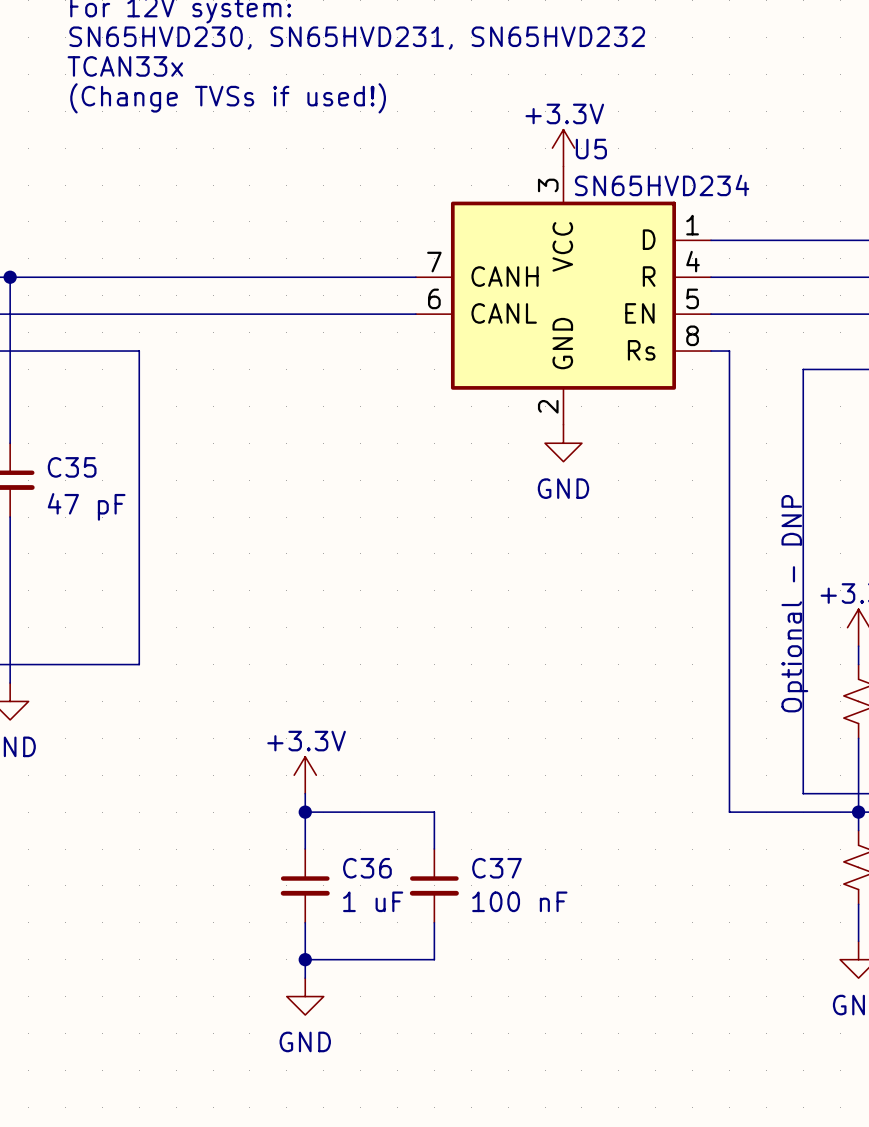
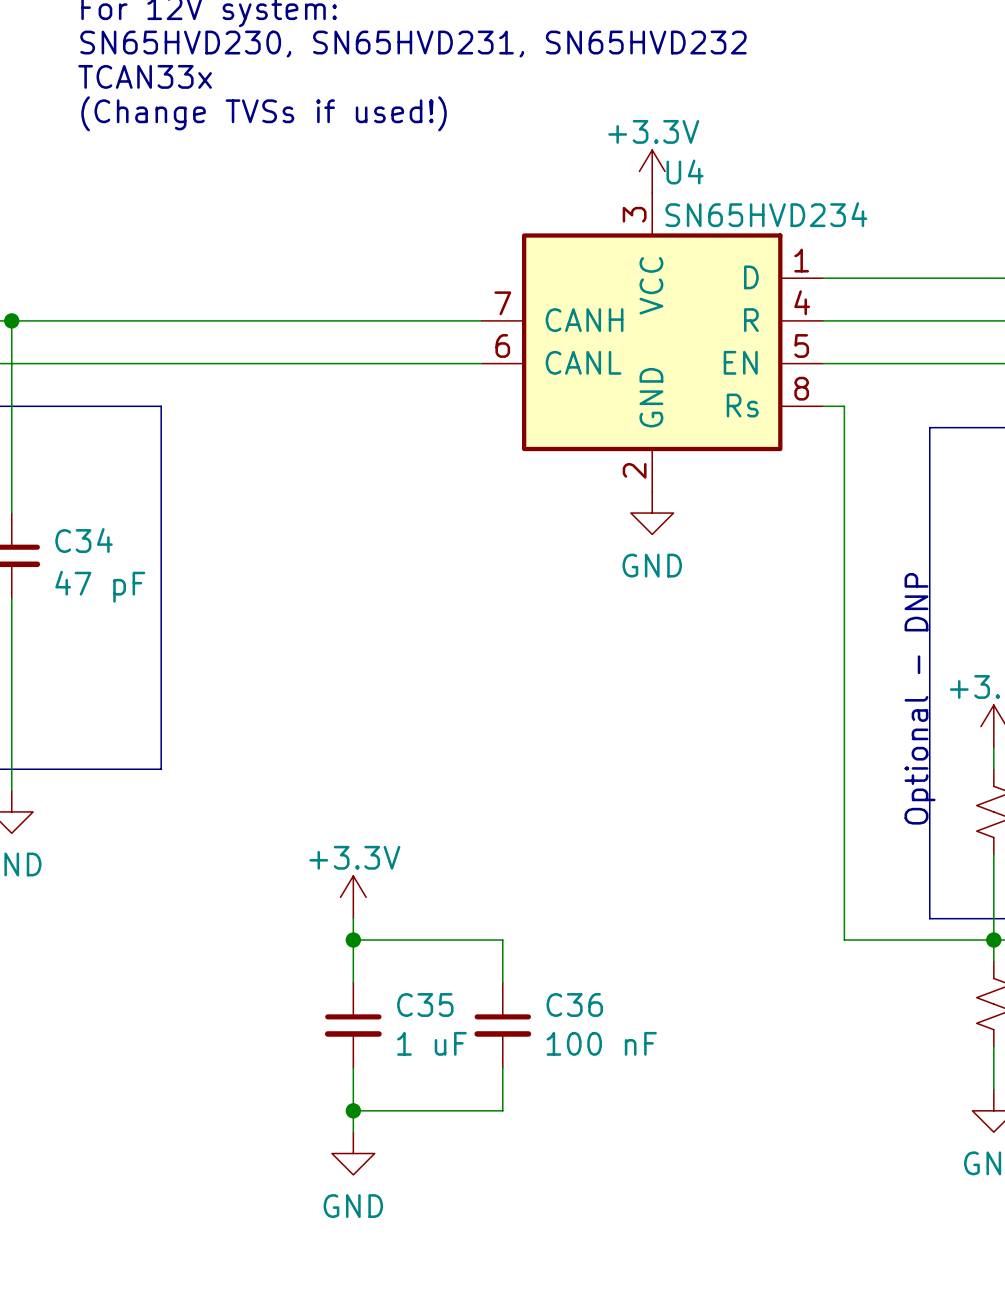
U5 name: U5 (591, 149) -> U4 (685, 172)
C35 name: C35 (72, 467) -> C34 (84, 540)
C36 name: C36 (367, 868) -> C35 (425, 1004)
C37 name: C37 (496, 868) -> C36 (574, 1004)

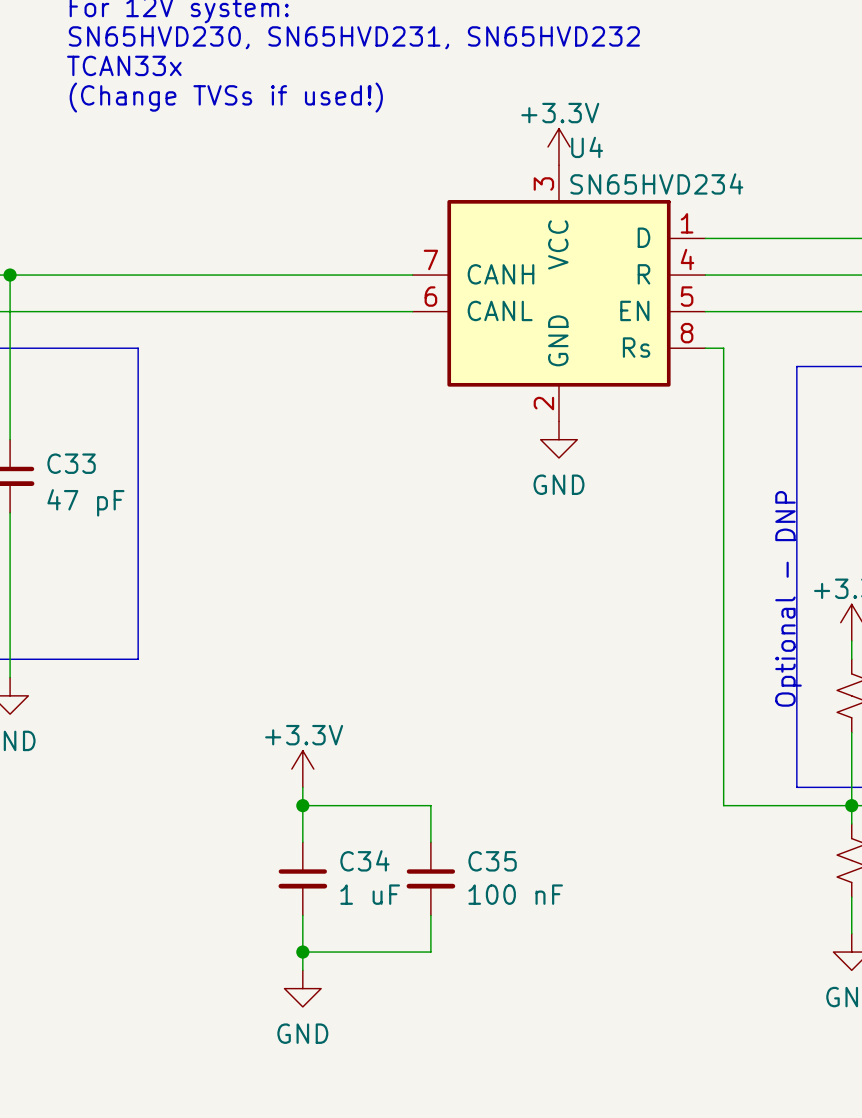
C34 name: C34 (84, 540) -> C33 (71, 463)
C35 name: C35 (425, 1004) -> C34 (364, 860)
C36 name: C36 (574, 1004) -> C35 (492, 861)

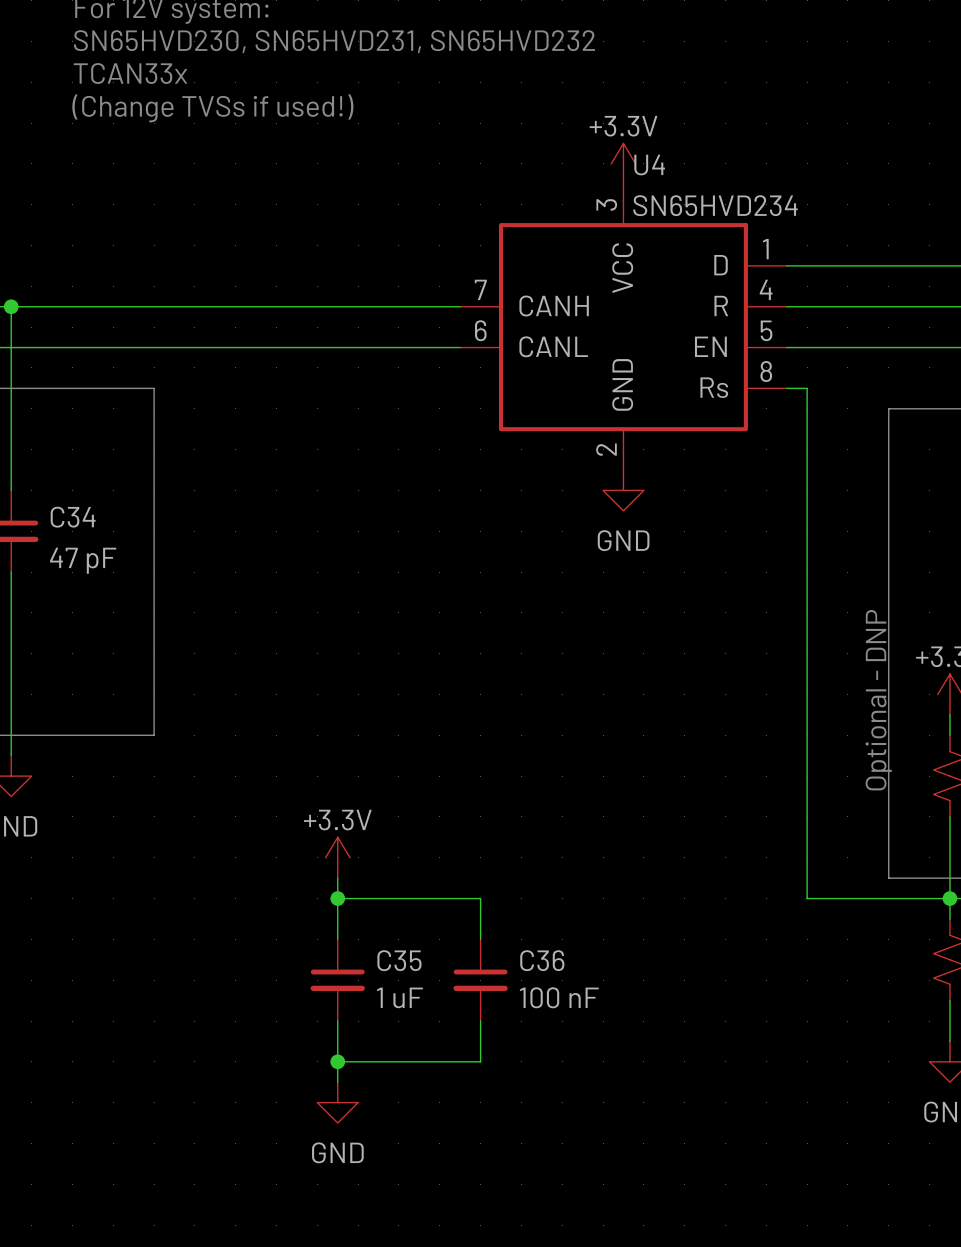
C33 name: C33 (71, 463) -> C34 (73, 517)
C34 name: C34 (364, 860) -> C35 (399, 960)
C35 name: C35 (492, 861) -> C36 (542, 960)

